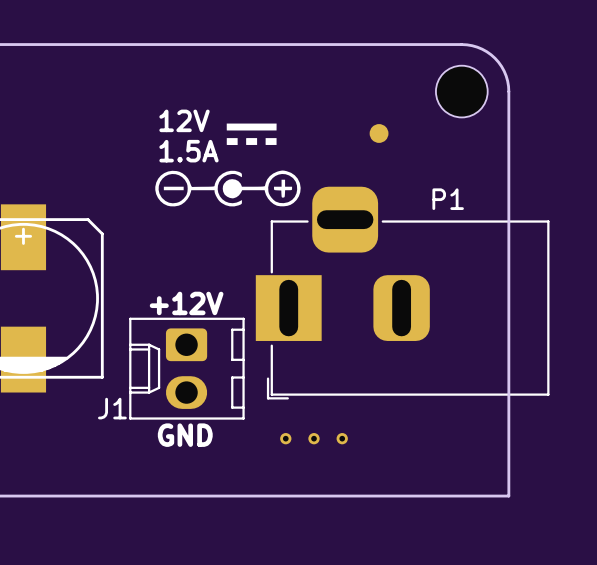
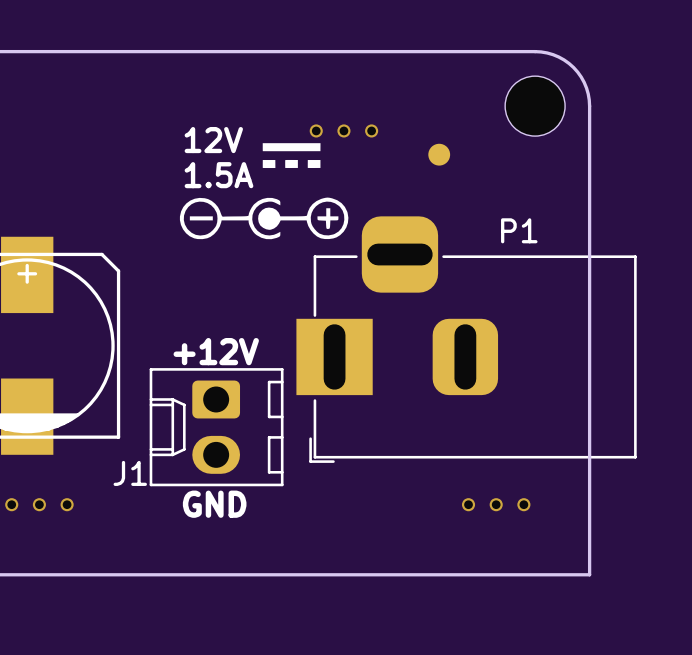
via: none -> (316, 130)
via: none -> (343, 130)
via: none -> (371, 130)
via: none -> (11, 504)
via: none -> (39, 504)
via: none -> (67, 504)
via: none -> (468, 504)
via: none -> (496, 504)
via: none -> (523, 504)
part: (285, 438) -> none
part: (314, 438) -> none
part: (342, 438) -> none

